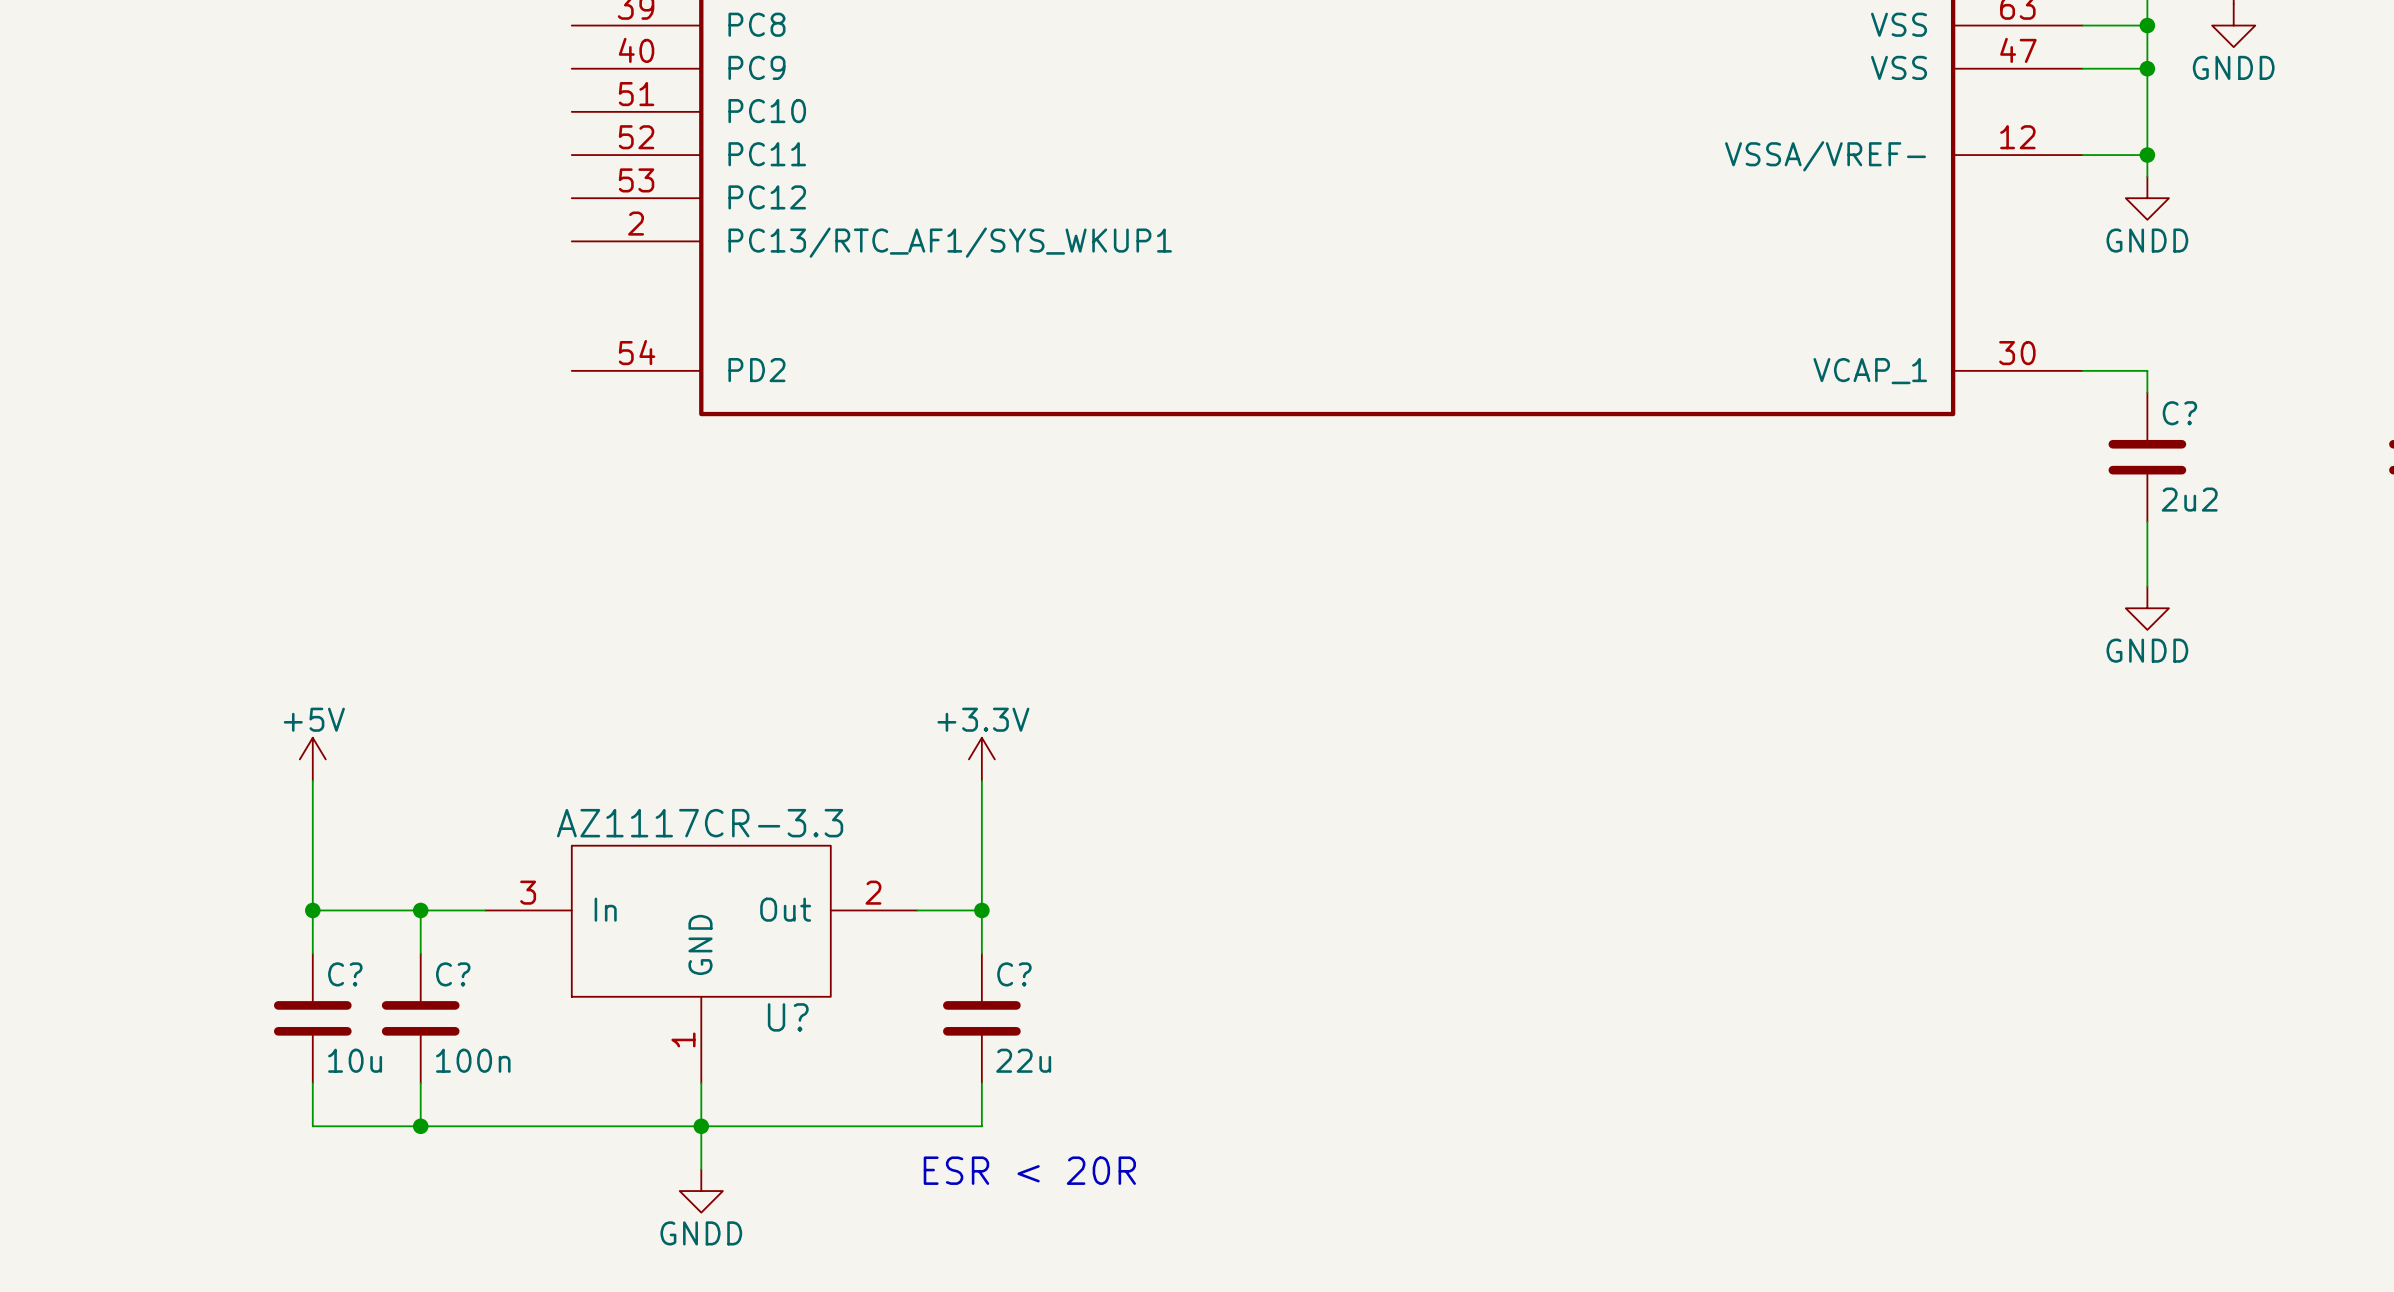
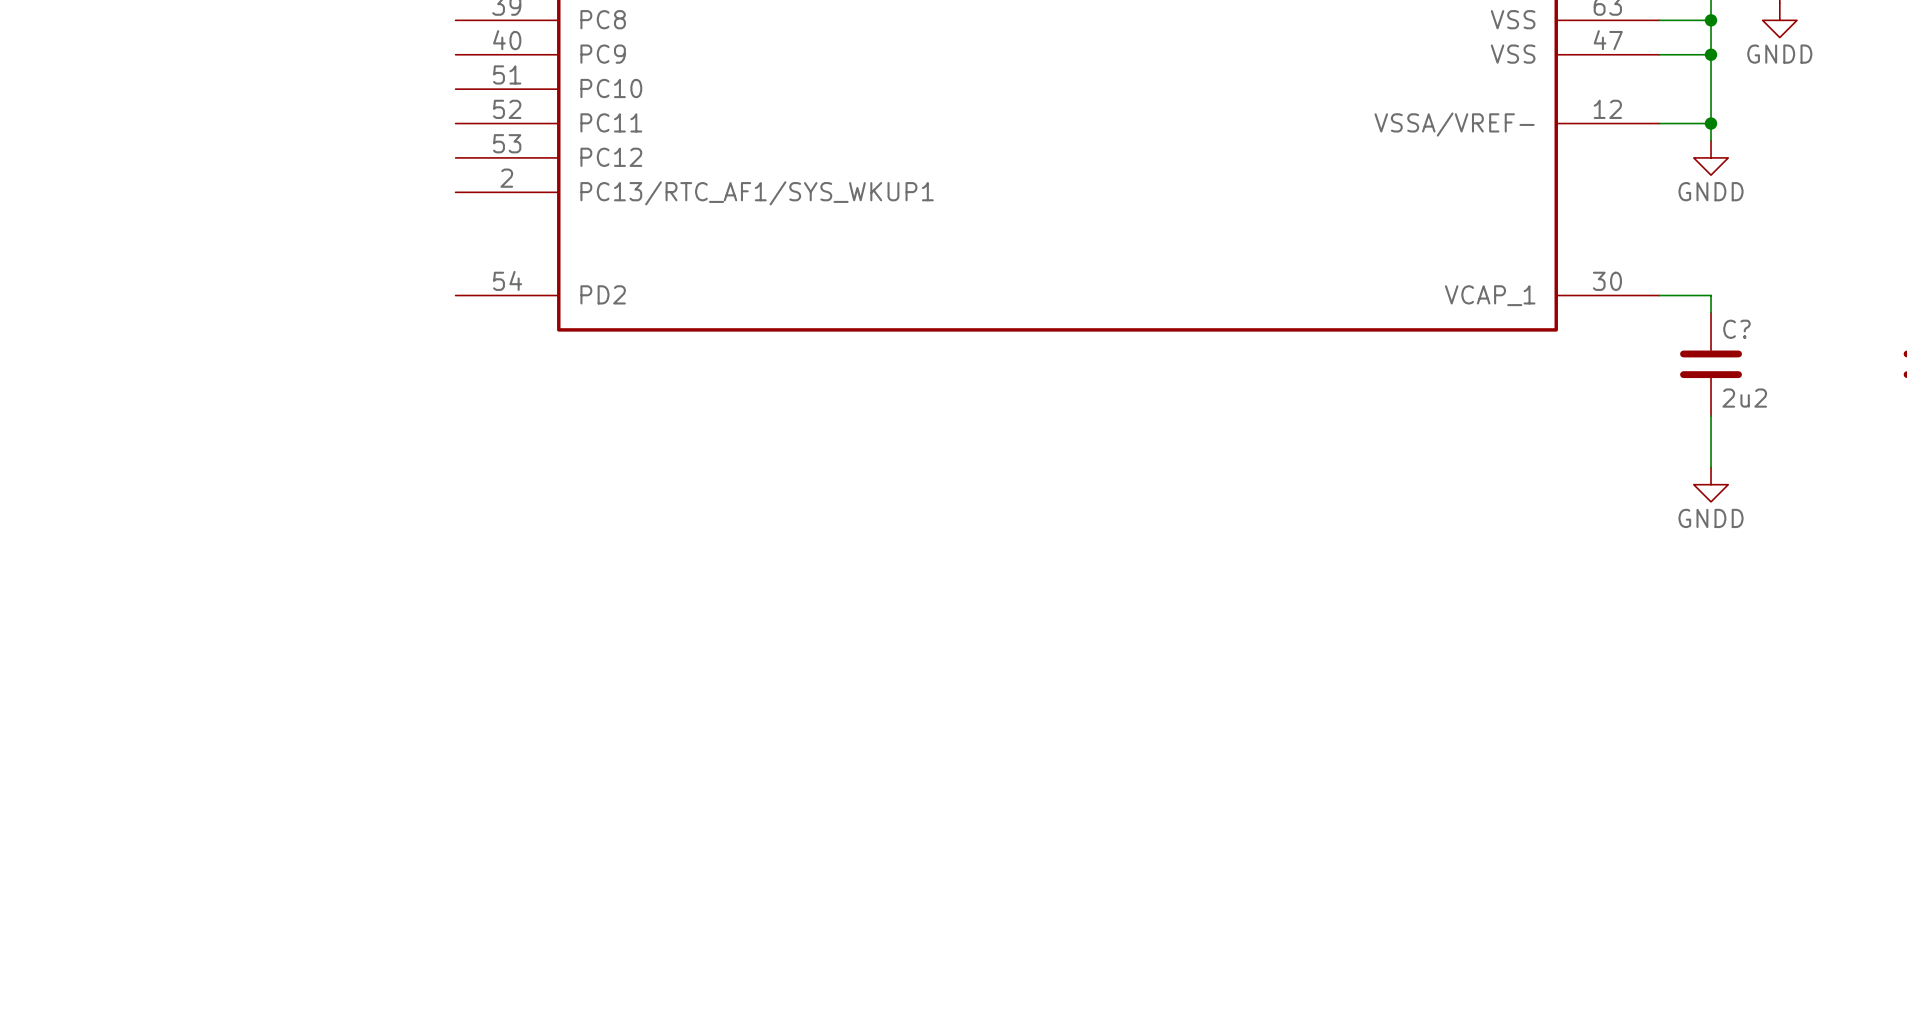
power symbol: +5V (312, 759) -> none
power symbol: +3.3V (981, 759) -> none
wire: (312, 780) (312, 953) -> none
wire: (981, 780) (981, 953) -> none
wire: (312, 910) (485, 910) -> none
junction: (312, 910) -> none
wire: (420, 910) (420, 953) -> none
junction: (420, 910) -> none
wire: (917, 910) (981, 910) -> none
junction: (981, 910) -> none
U?: AZ1117CR-3.3 (701, 964) -> none
C?: 10u (312, 1018) -> none
C?: 100n (420, 1018) -> none
C?: 22u (981, 1018) -> none
wire: (312, 1083) (312, 1126) (981, 1126) (981, 1083) -> none
wire: (420, 1083) (420, 1126) -> none
wire: (701, 1083) (701, 1169) -> none
junction: (420, 1126) -> none
junction: (701, 1126) -> none
text: ESR < 20R (1029, 1170) -> none
power symbol: GNDD (701, 1191) -> none

